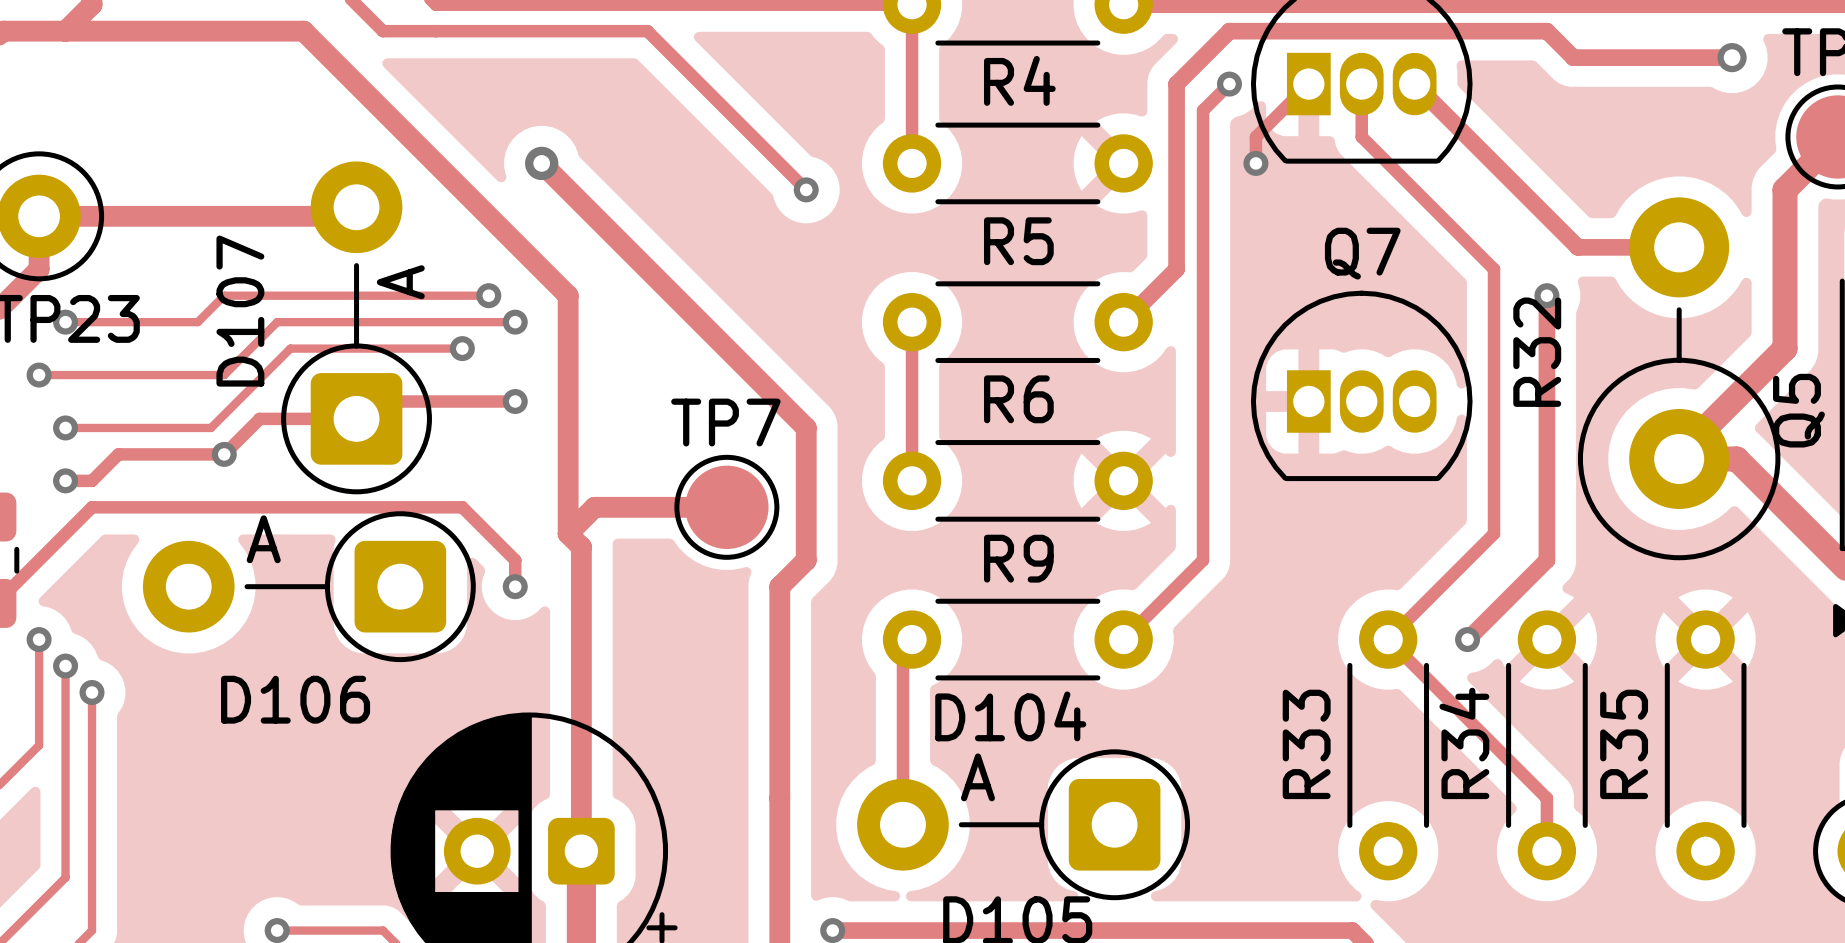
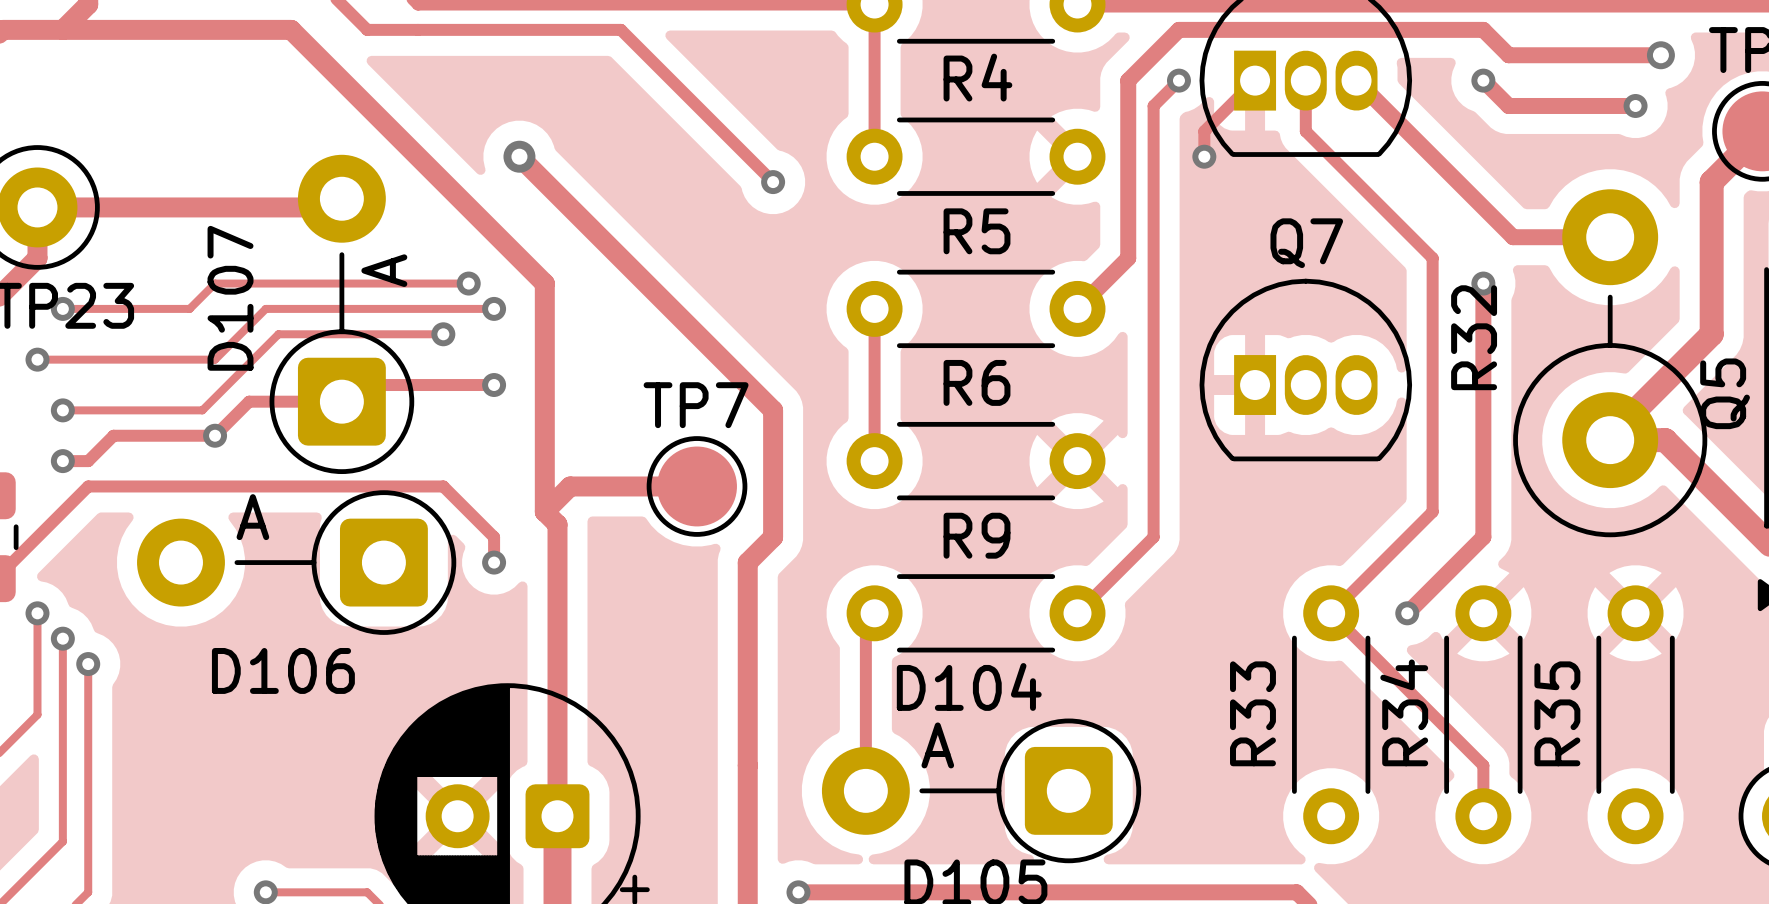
track: none -> (1483, 80) (1508, 105) (1635, 105)
via: none -> (1483, 80)
via: none -> (1635, 105)

